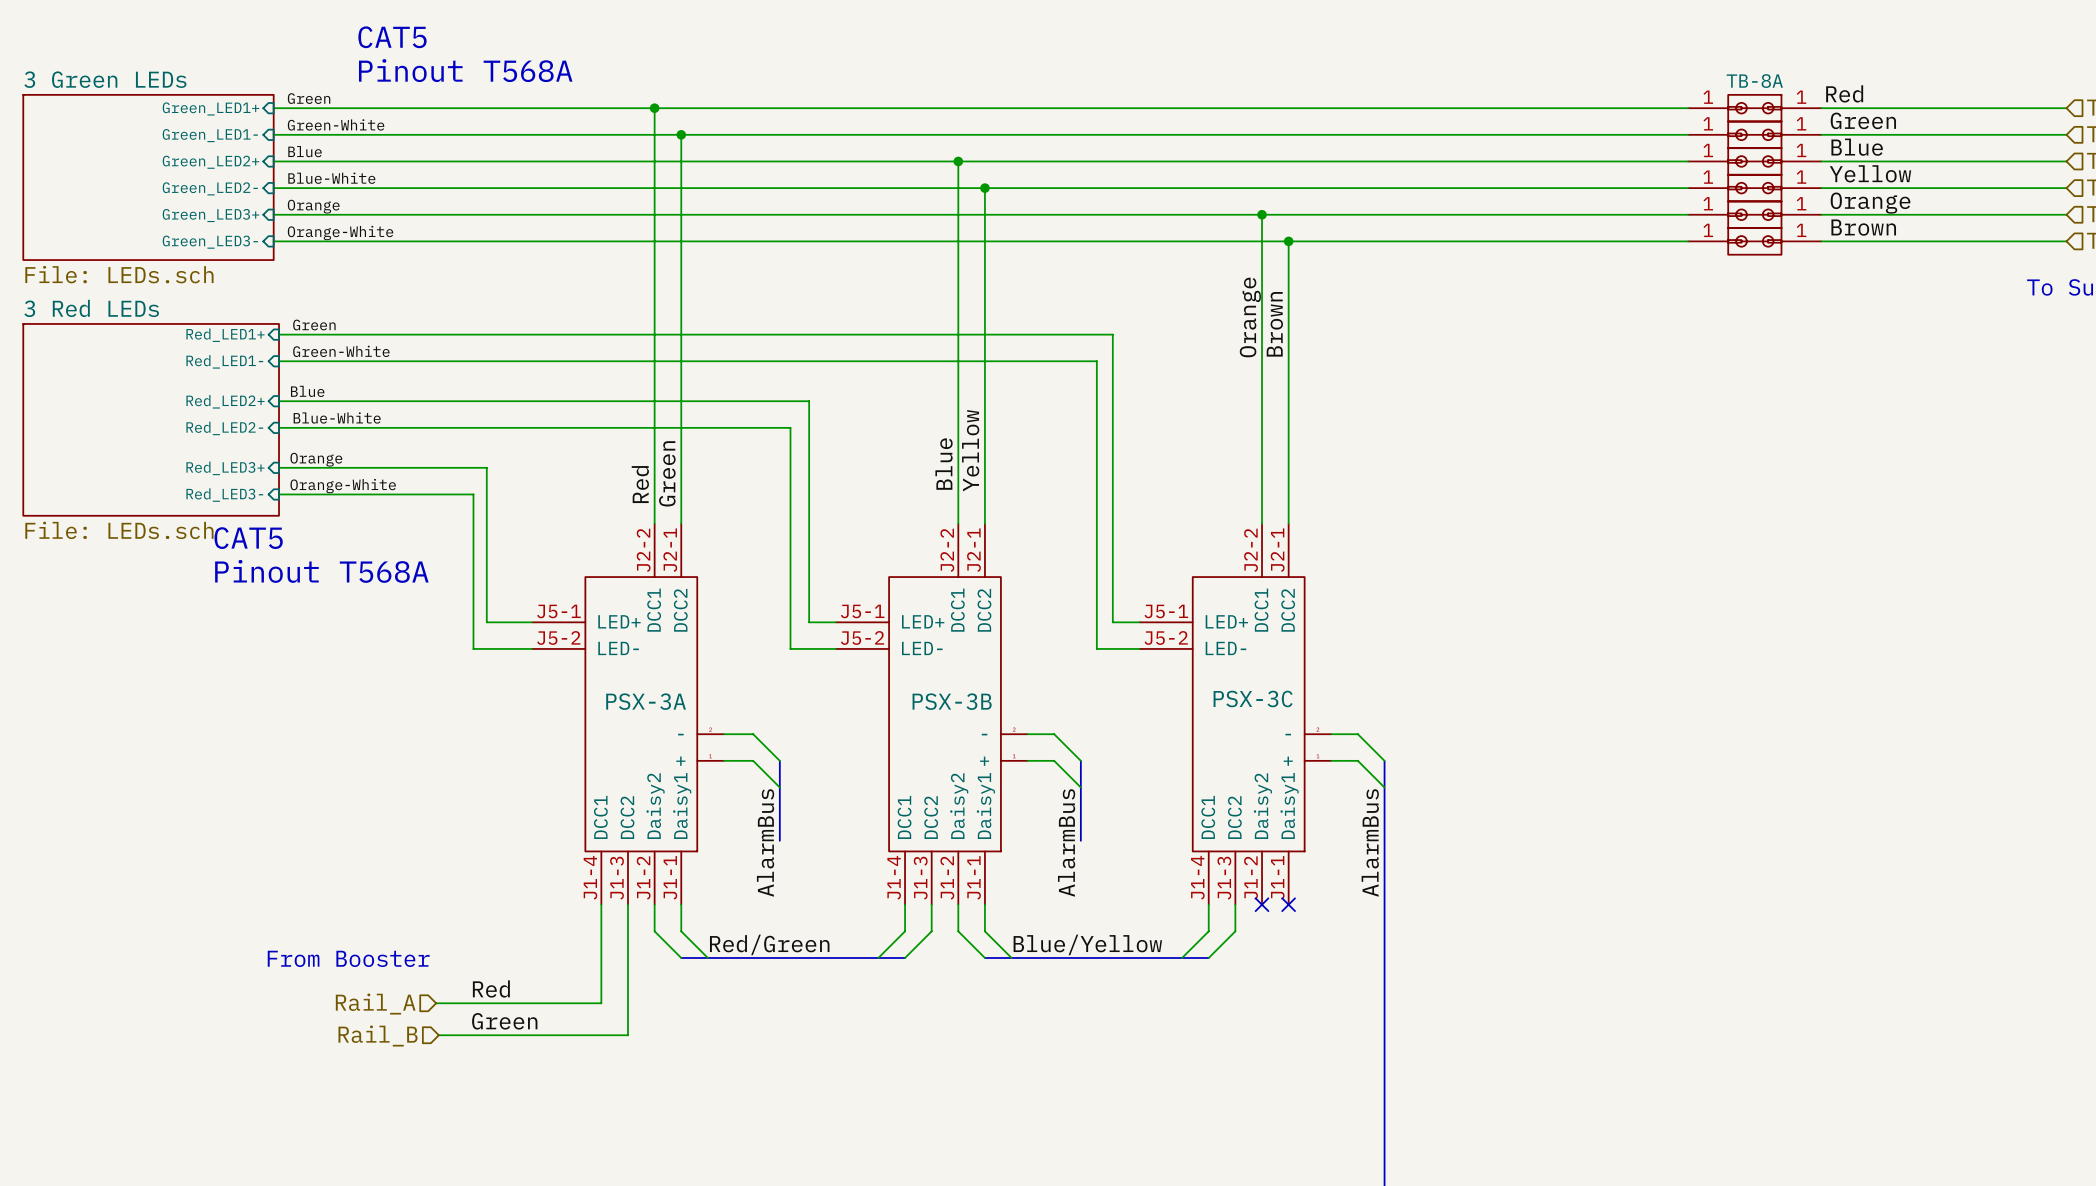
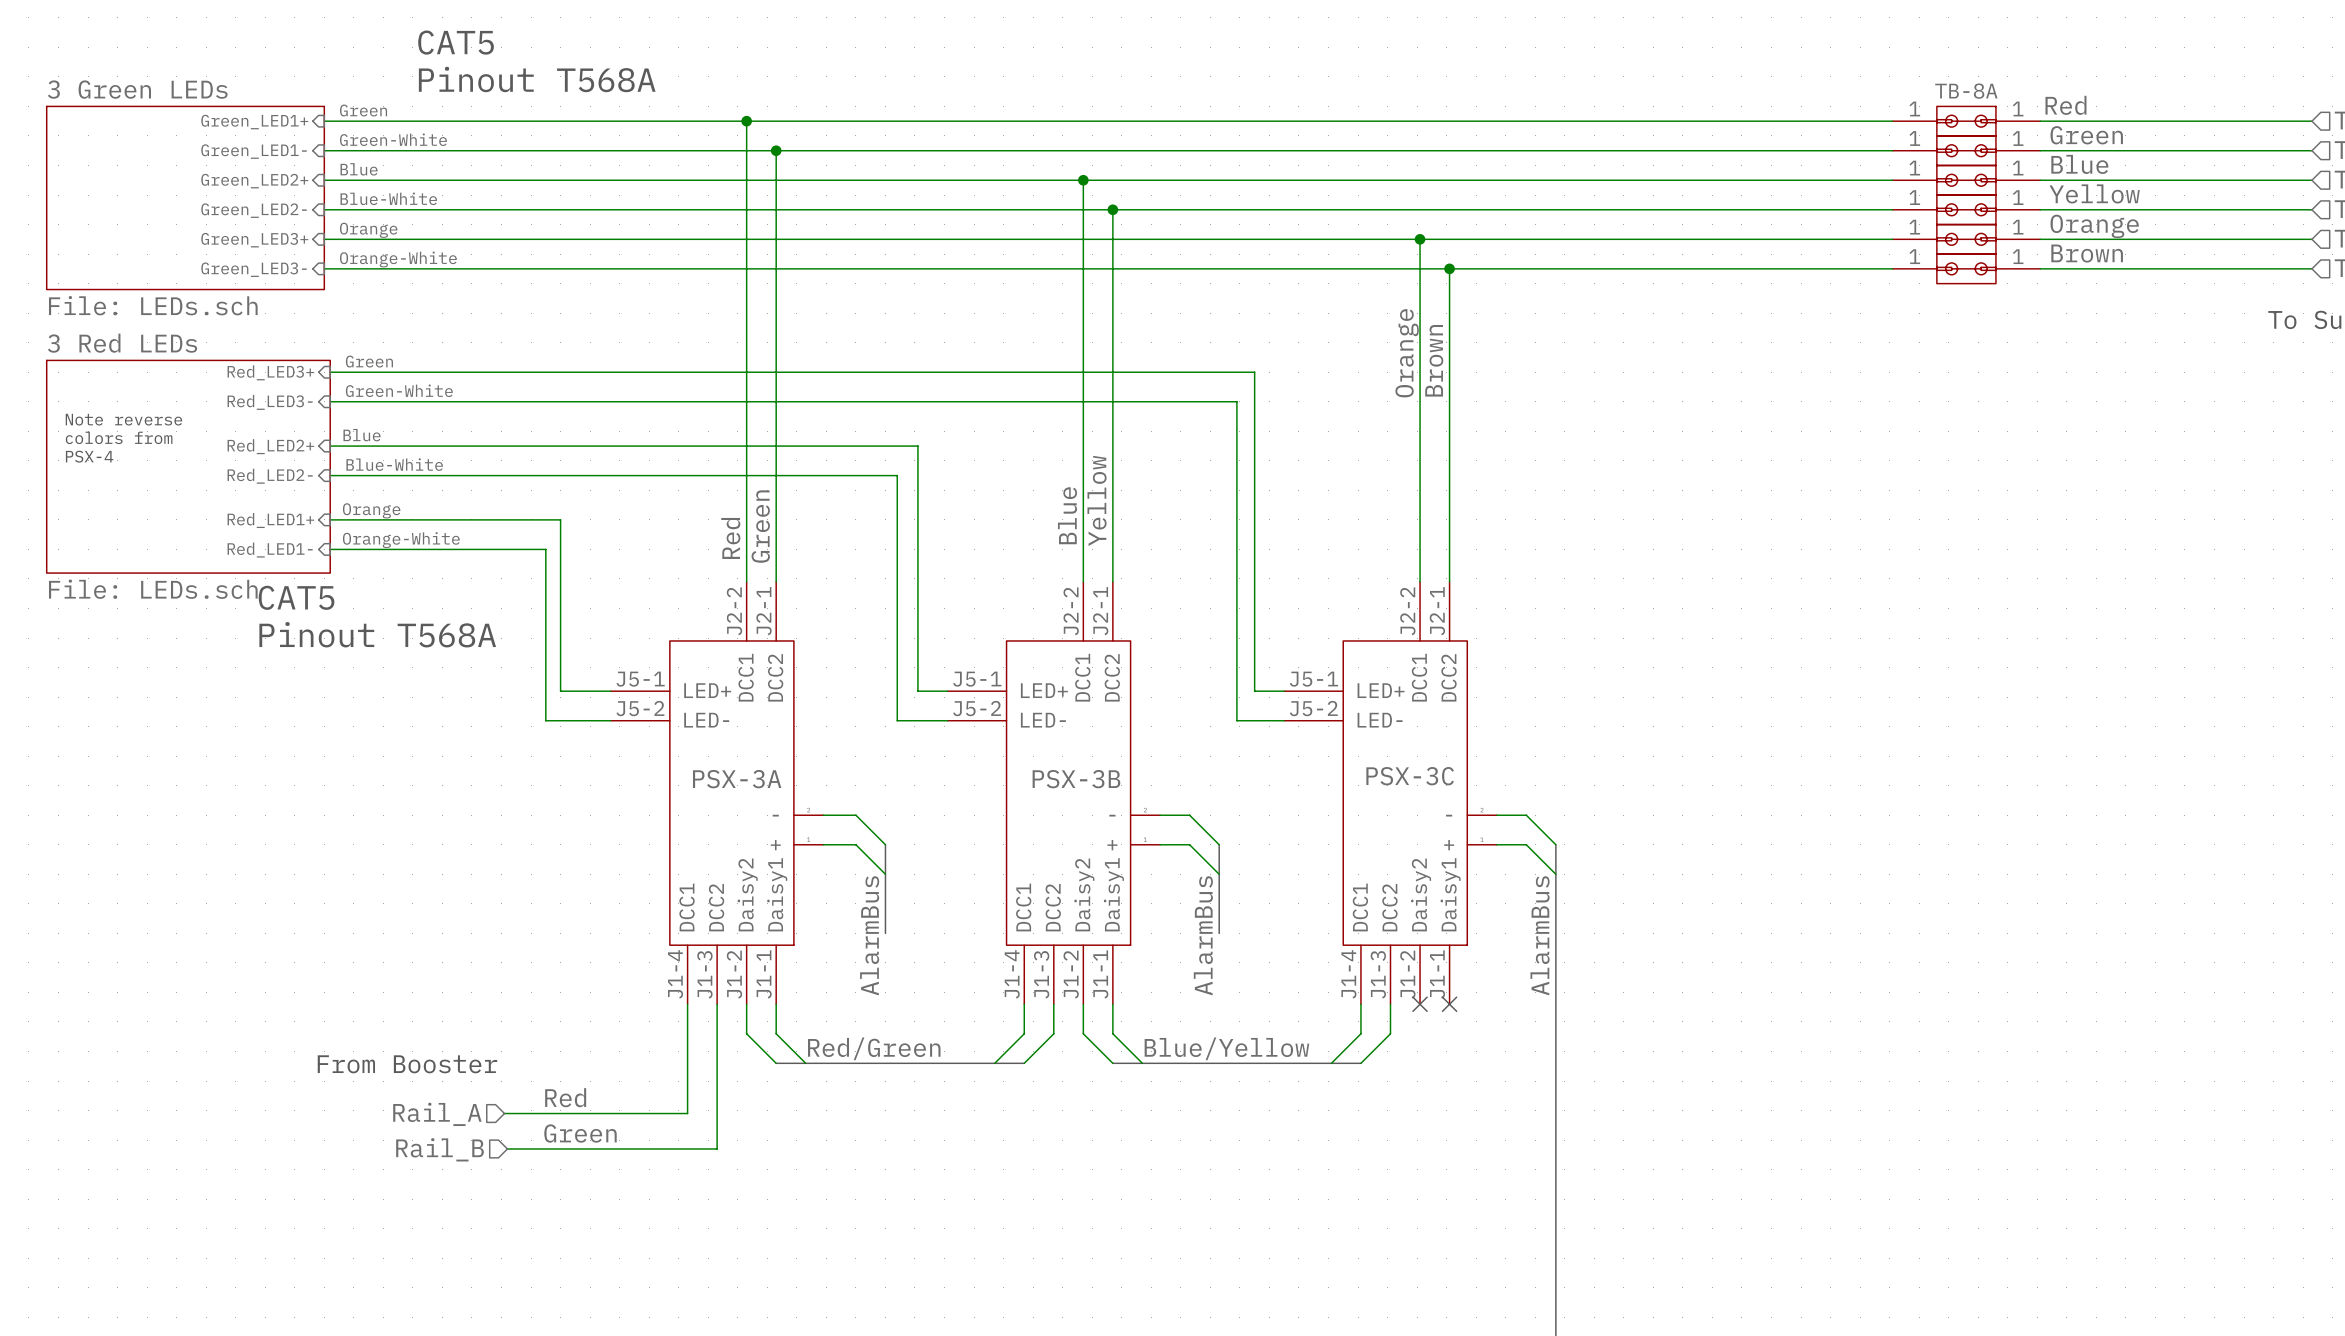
sheet pin: Red_LED1+ (225, 335) -> Red_LED3+ (270, 372)
sheet pin: Red_LED1- (224, 361) -> Red_LED3- (270, 402)
text: none -> Note reverse (123, 419)
text: none -> colors from (119, 437)
text: none -> PSX-4 (89, 456)
sheet pin: Red_LED3+ (225, 468) -> Red_LED1+ (270, 520)
sheet pin: Red_LED3- (224, 495) -> Red_LED1- (270, 550)

